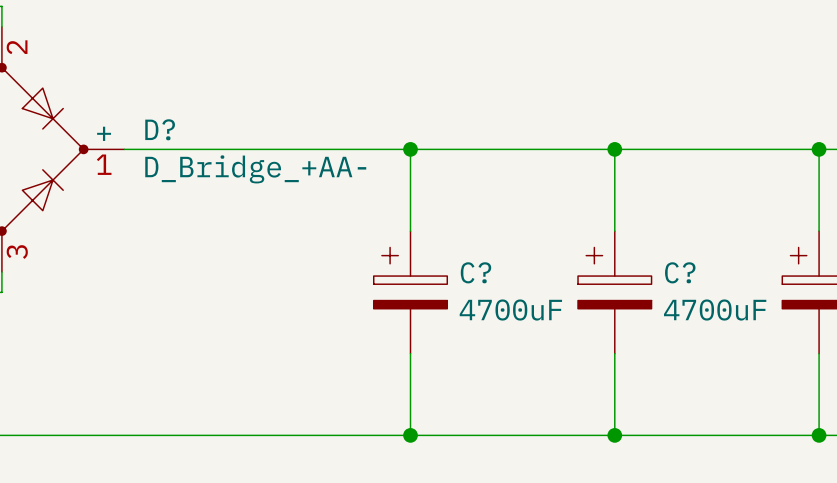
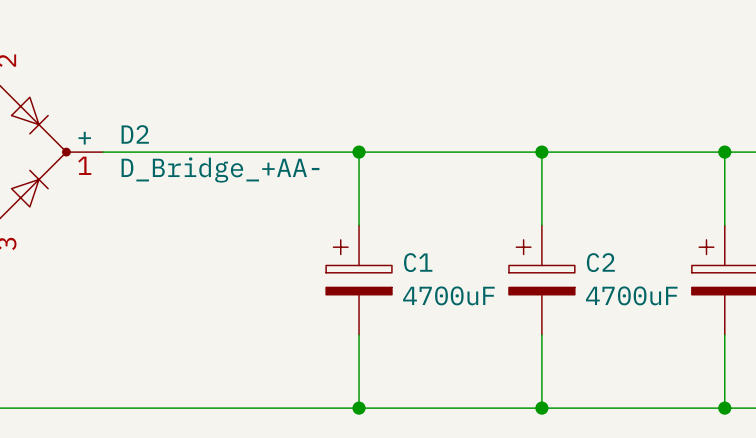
D? name: D? (160, 129) -> D2 (135, 134)
C? name: C? (475, 272) -> C1 (418, 262)
C? name: C? (680, 272) -> C2 (600, 262)

